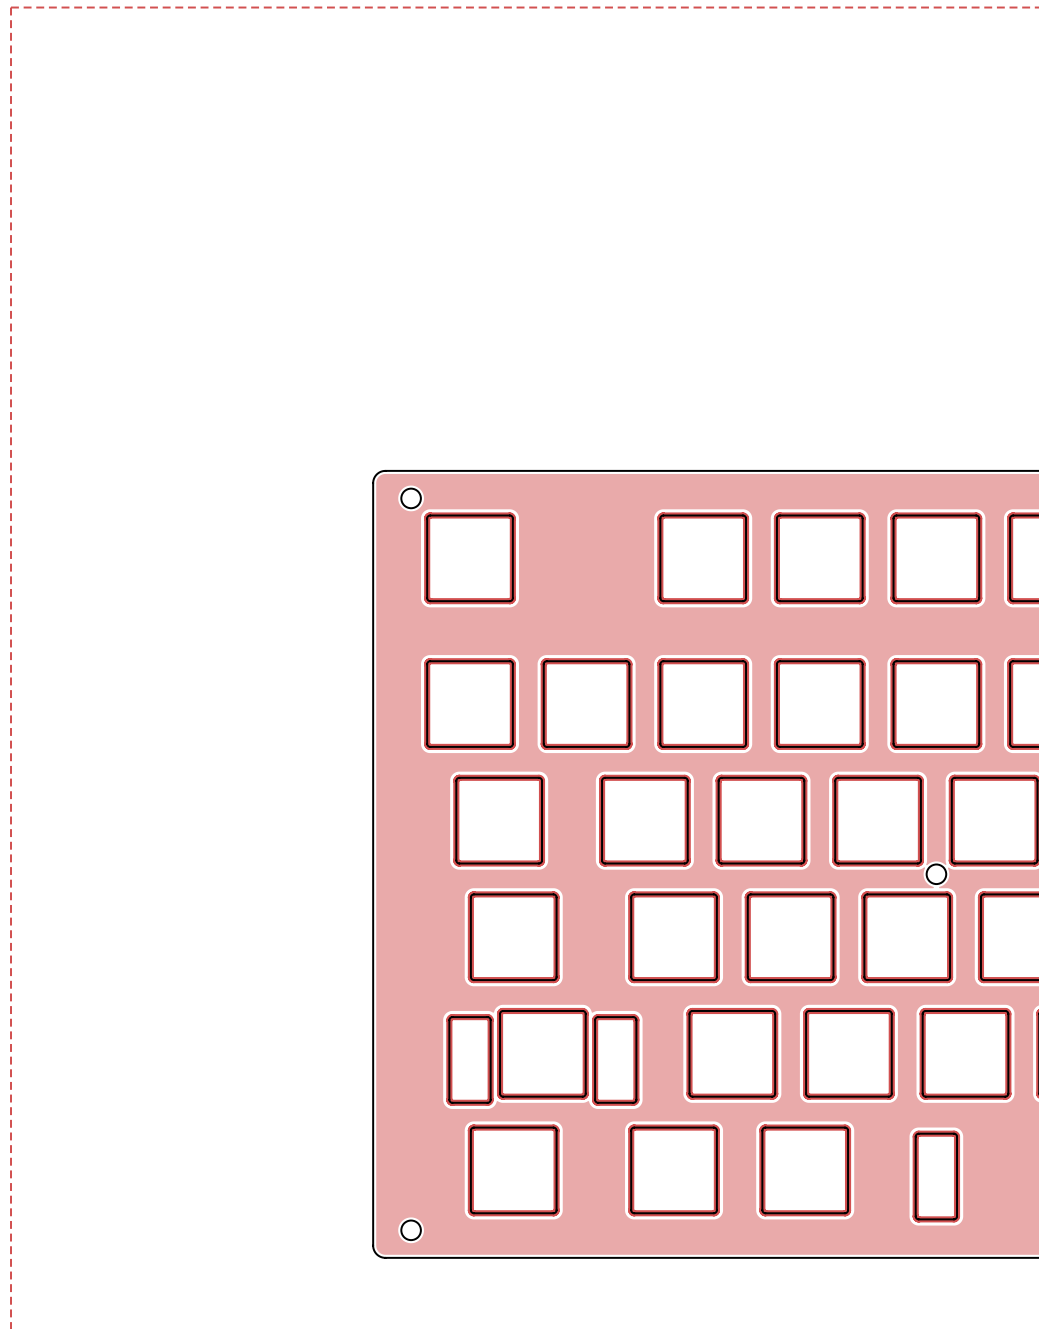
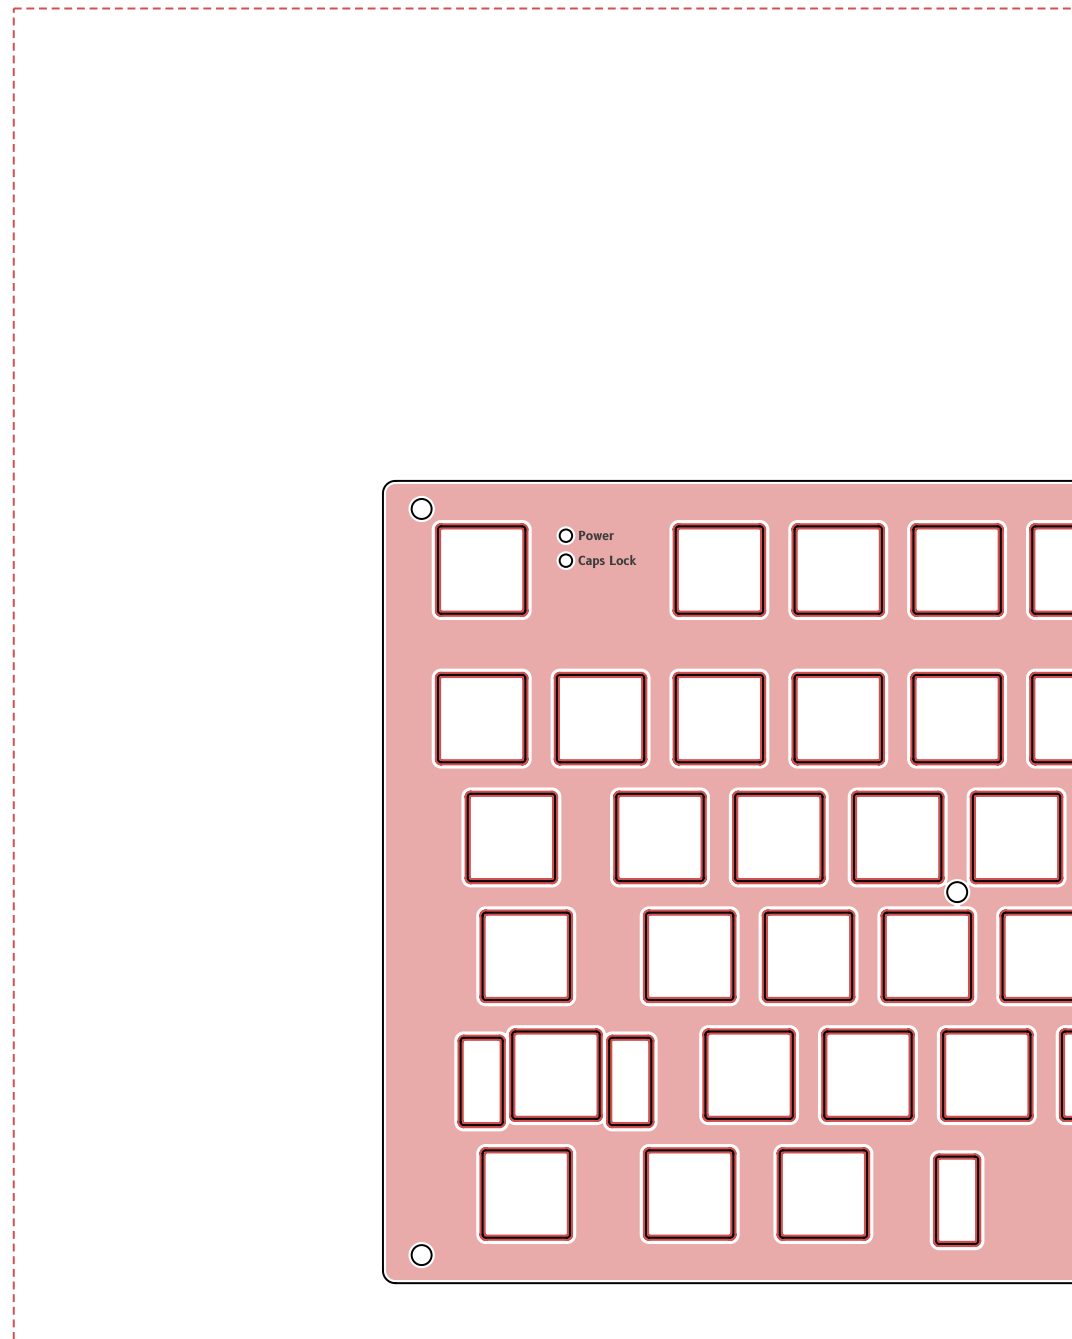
round board edge: none -> [559, 529, 573, 543]
text: none -> Power (596, 535)
round board edge: none -> [559, 553, 573, 568]
text: none -> Caps Lock (607, 561)

